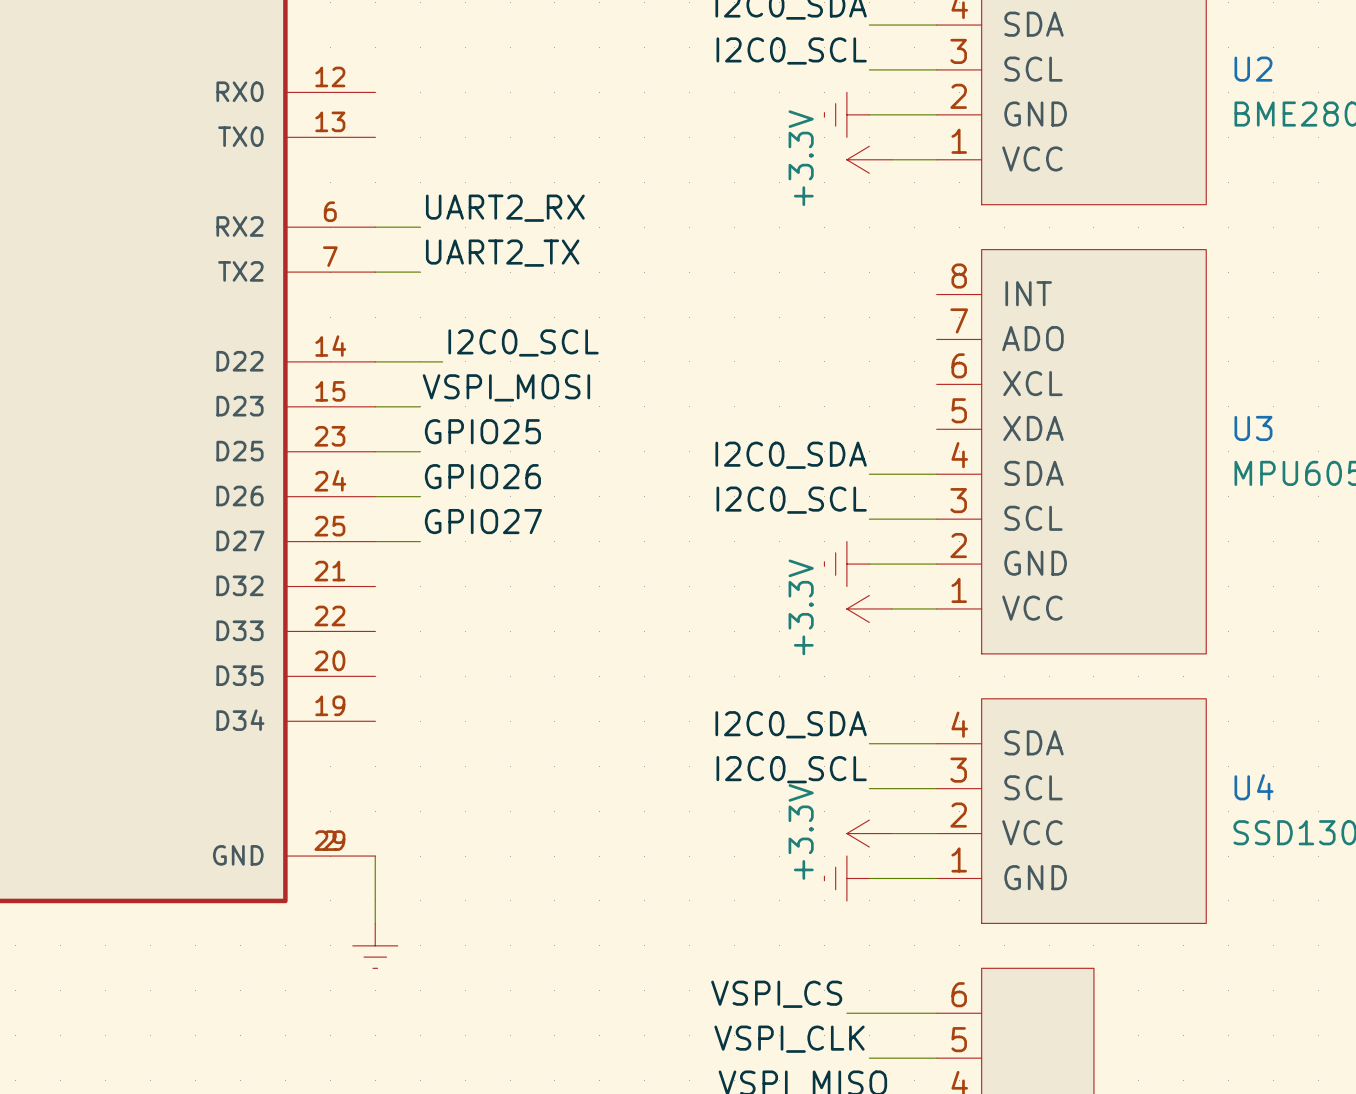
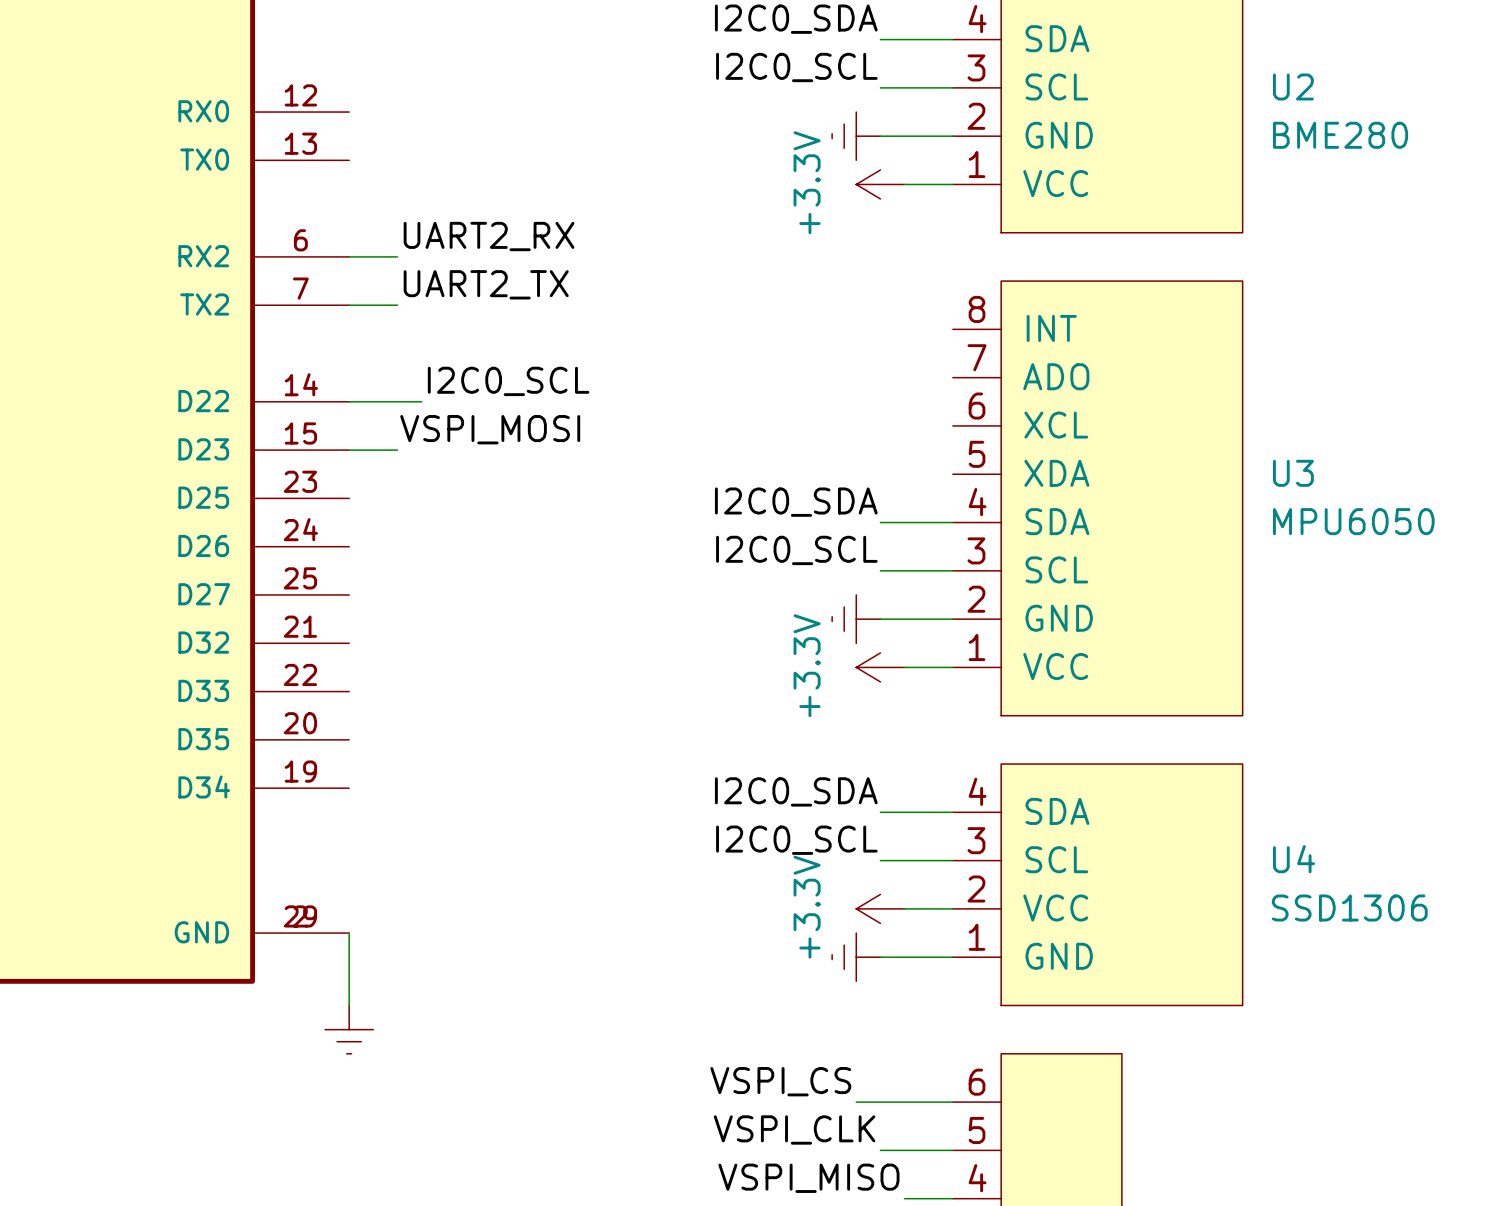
label: GPIO25 (482, 431) -> none
wire: (375, 451) (420, 451) -> none
label: GPIO26 (482, 476) -> none
wire: (375, 496) (420, 496) -> none
label: GPIO27 (483, 521) -> none
wire: (375, 541) (420, 541) -> none

